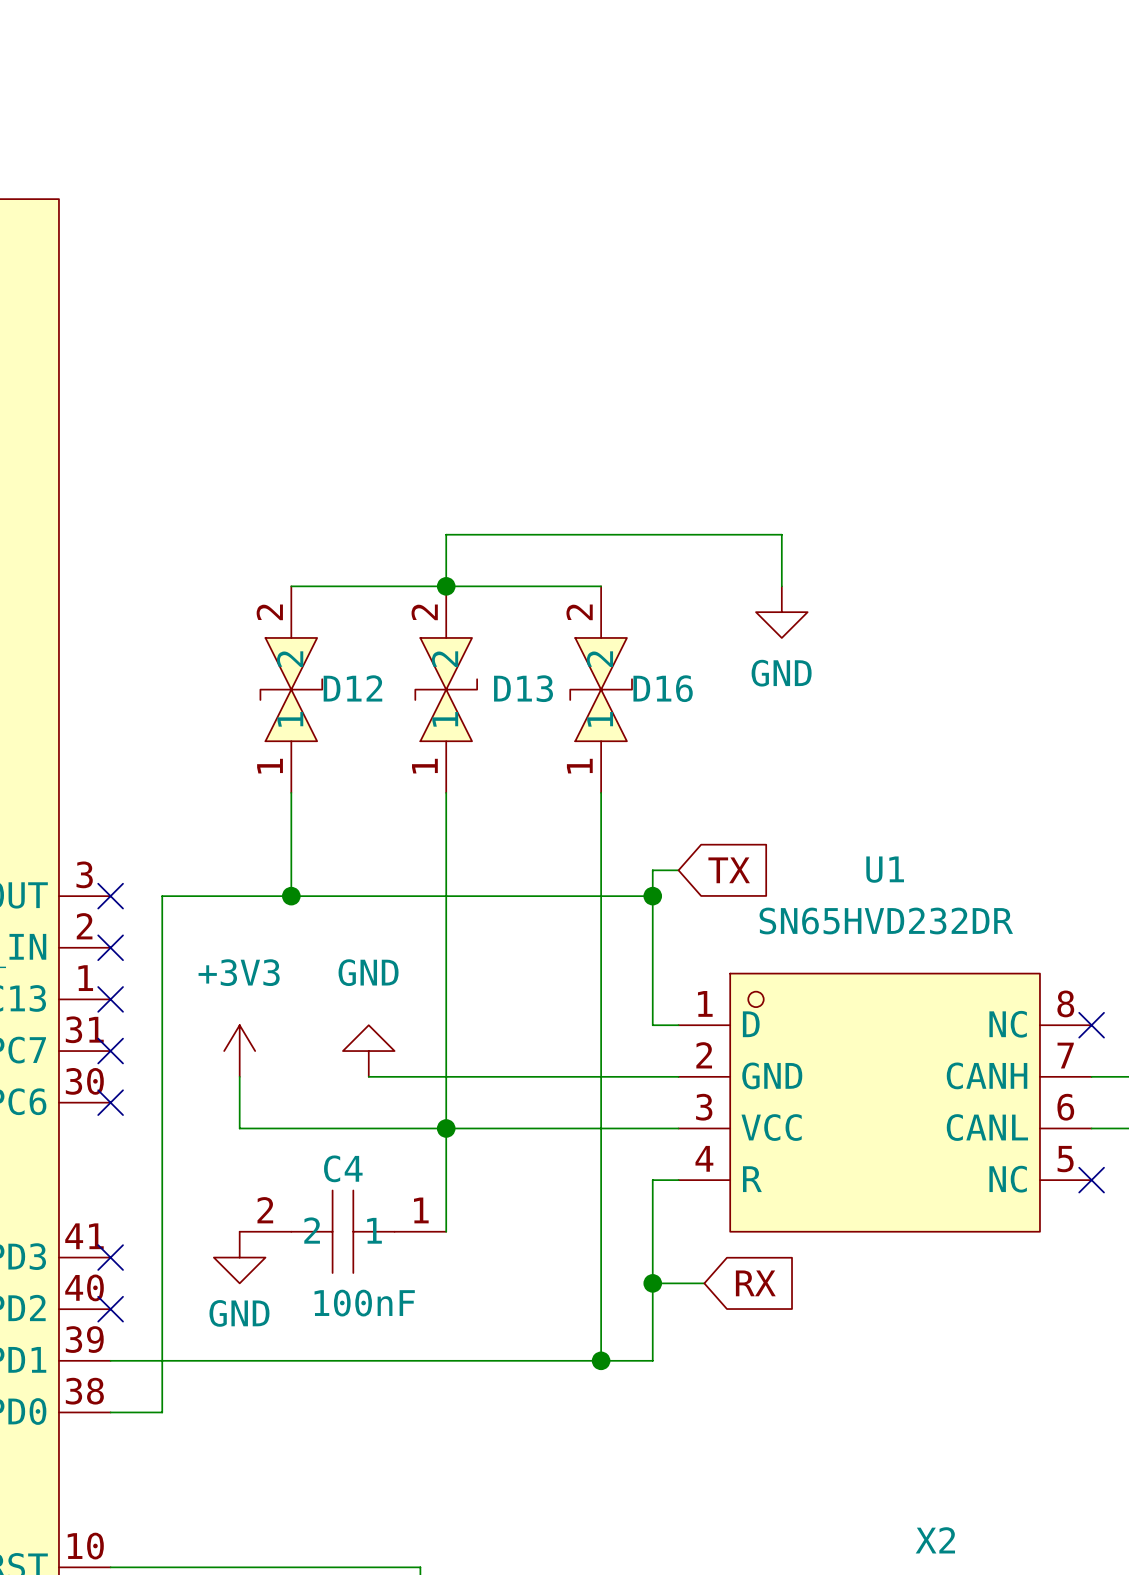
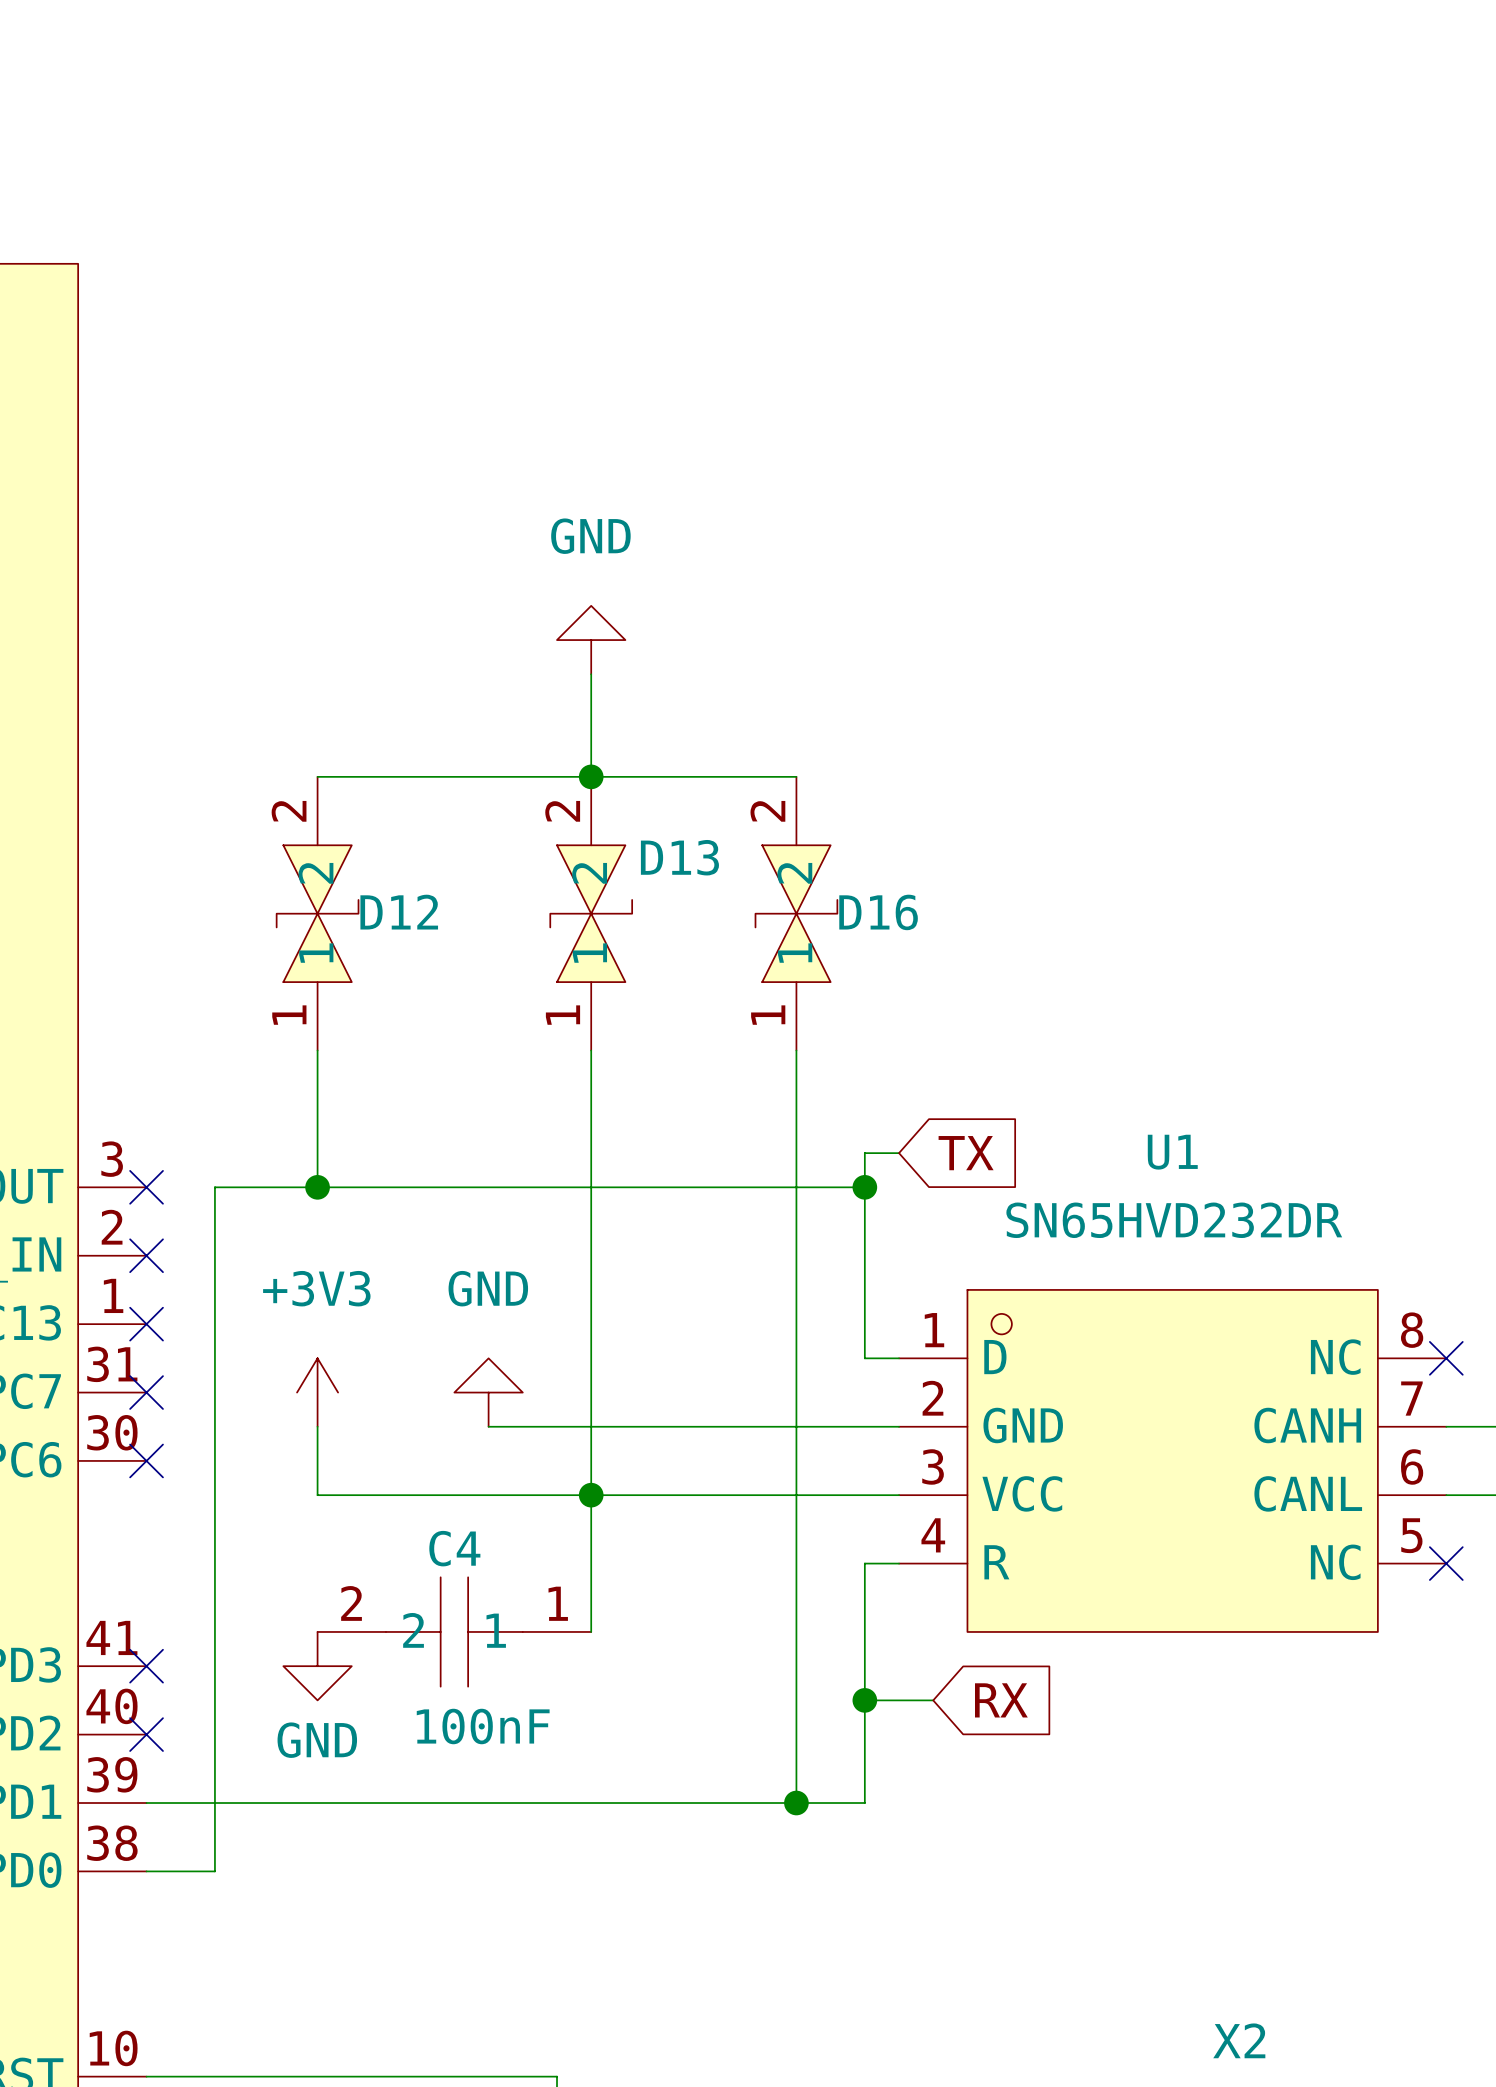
wire: (446, 534) (781, 534) (781, 586) -> (591, 708) (591, 674)
wire: none -> (317, 776) (385, 776)
power symbol rotation: 0° (781, 612) -> 180° (591, 640)
power symbol position: GND (781, 612) -> GND (591, 640)
D13 name position: D13 (523, 688) -> D13 (679, 857)
D12 position: (291, 689) -> (317, 913)
wire: (291, 792) (291, 896) -> (317, 1050) (317, 1187)
junction position: (291, 896) -> (317, 1187)

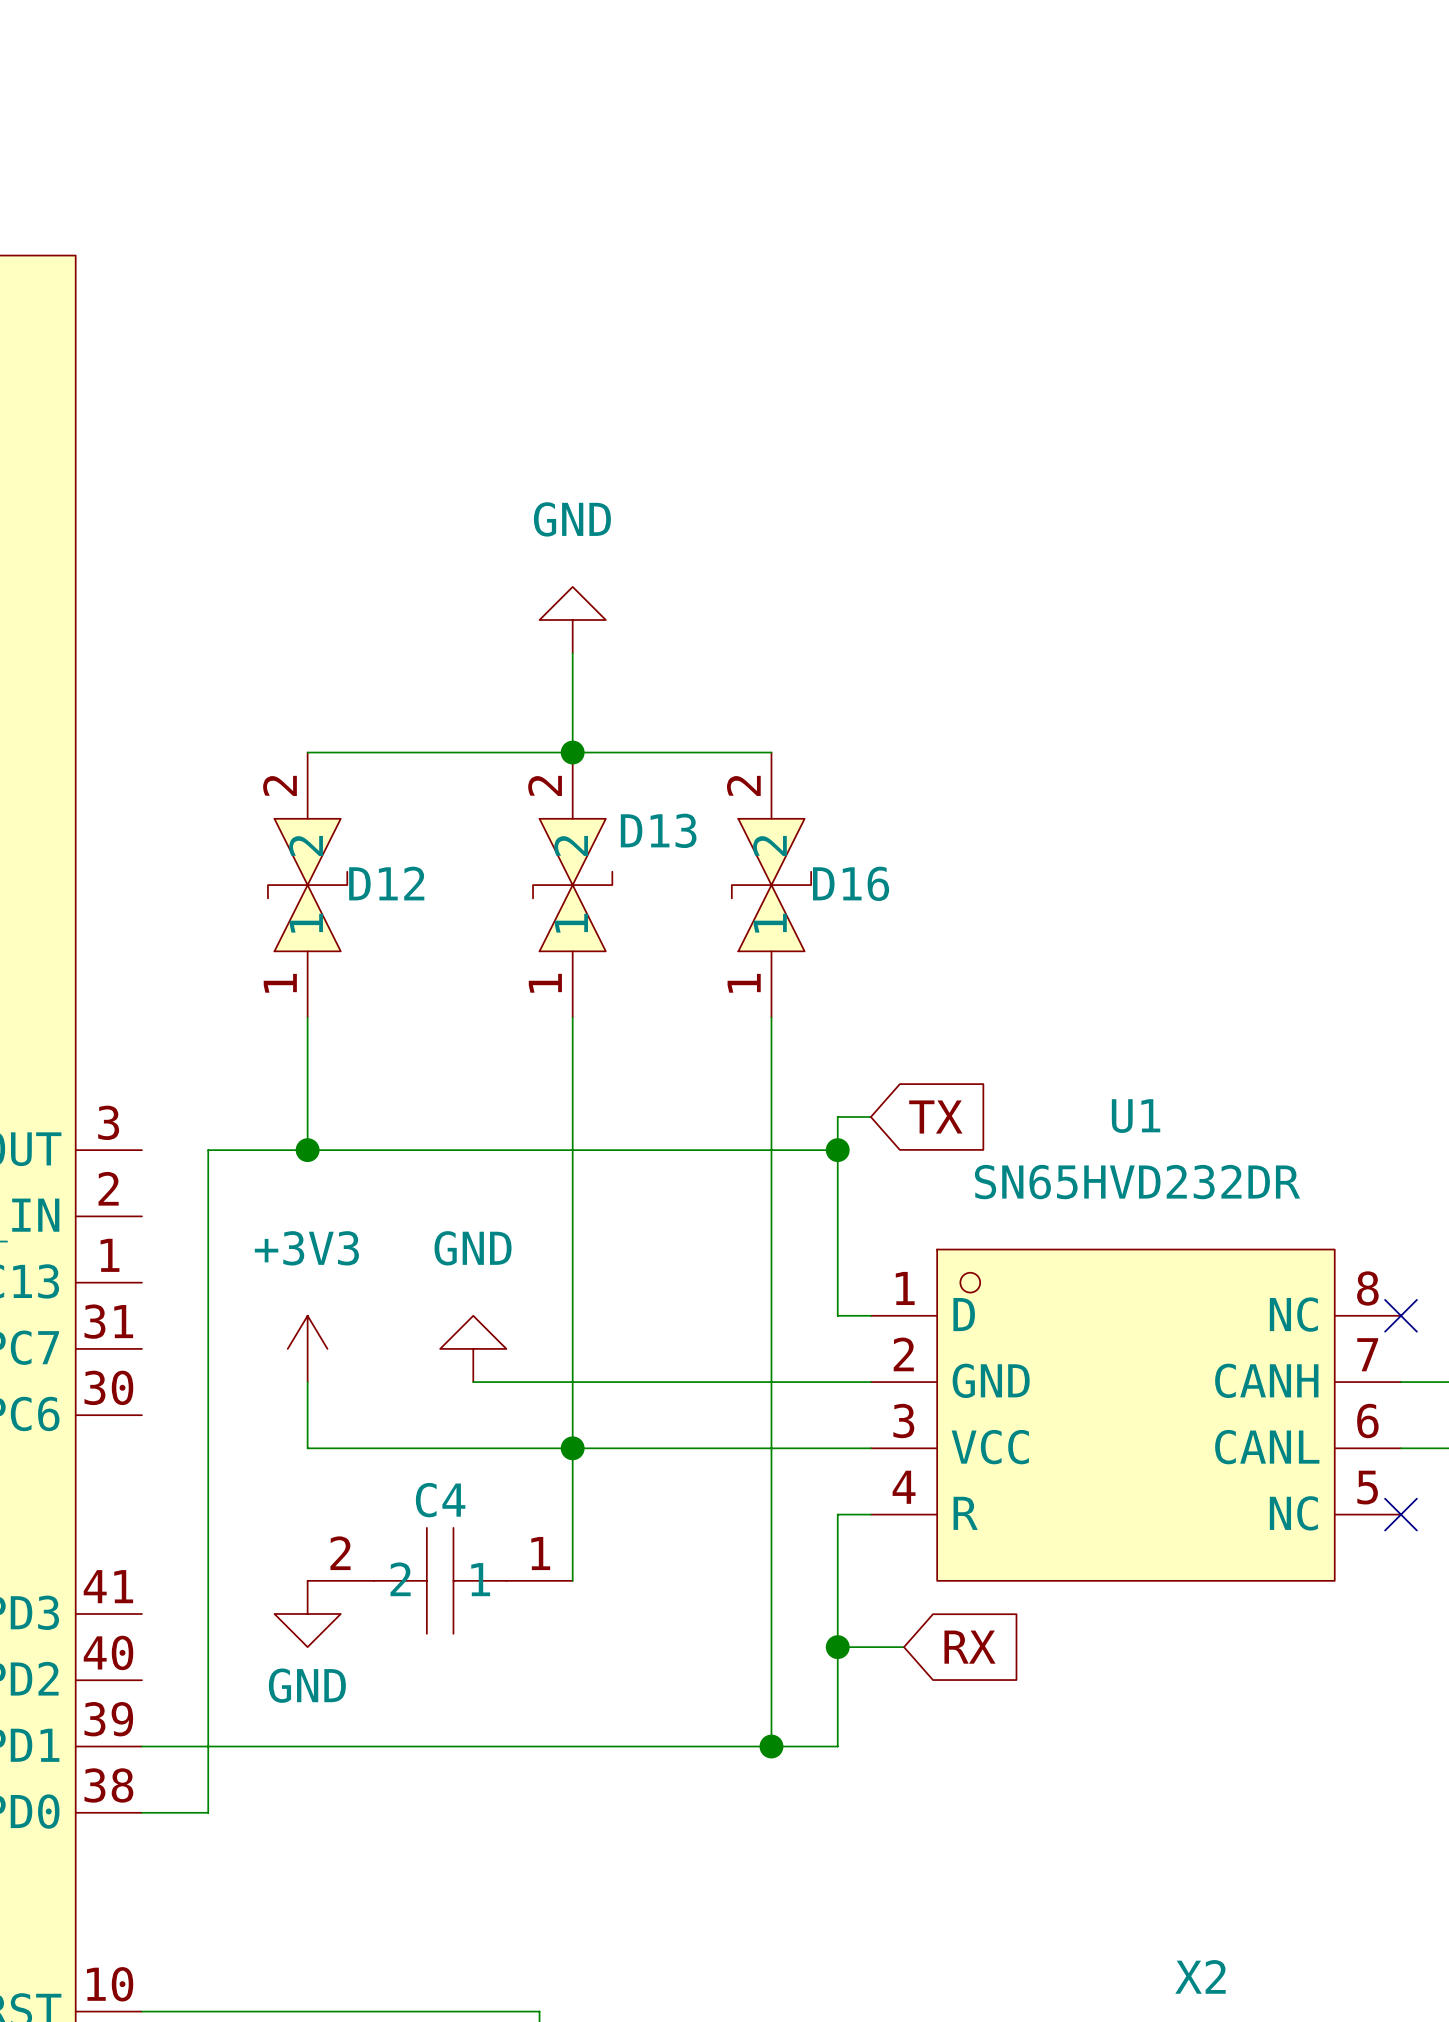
no-connect mark: (146, 1187) -> none
no-connect mark: (146, 1255) -> none
no-connect mark: (146, 1324) -> none
no-connect mark: (146, 1392) -> none
no-connect mark: (146, 1460) -> none
no-connect mark: (146, 1666) -> none
C4 value: 100nF (483, 1726) -> none
no-connect mark: (146, 1734) -> none

